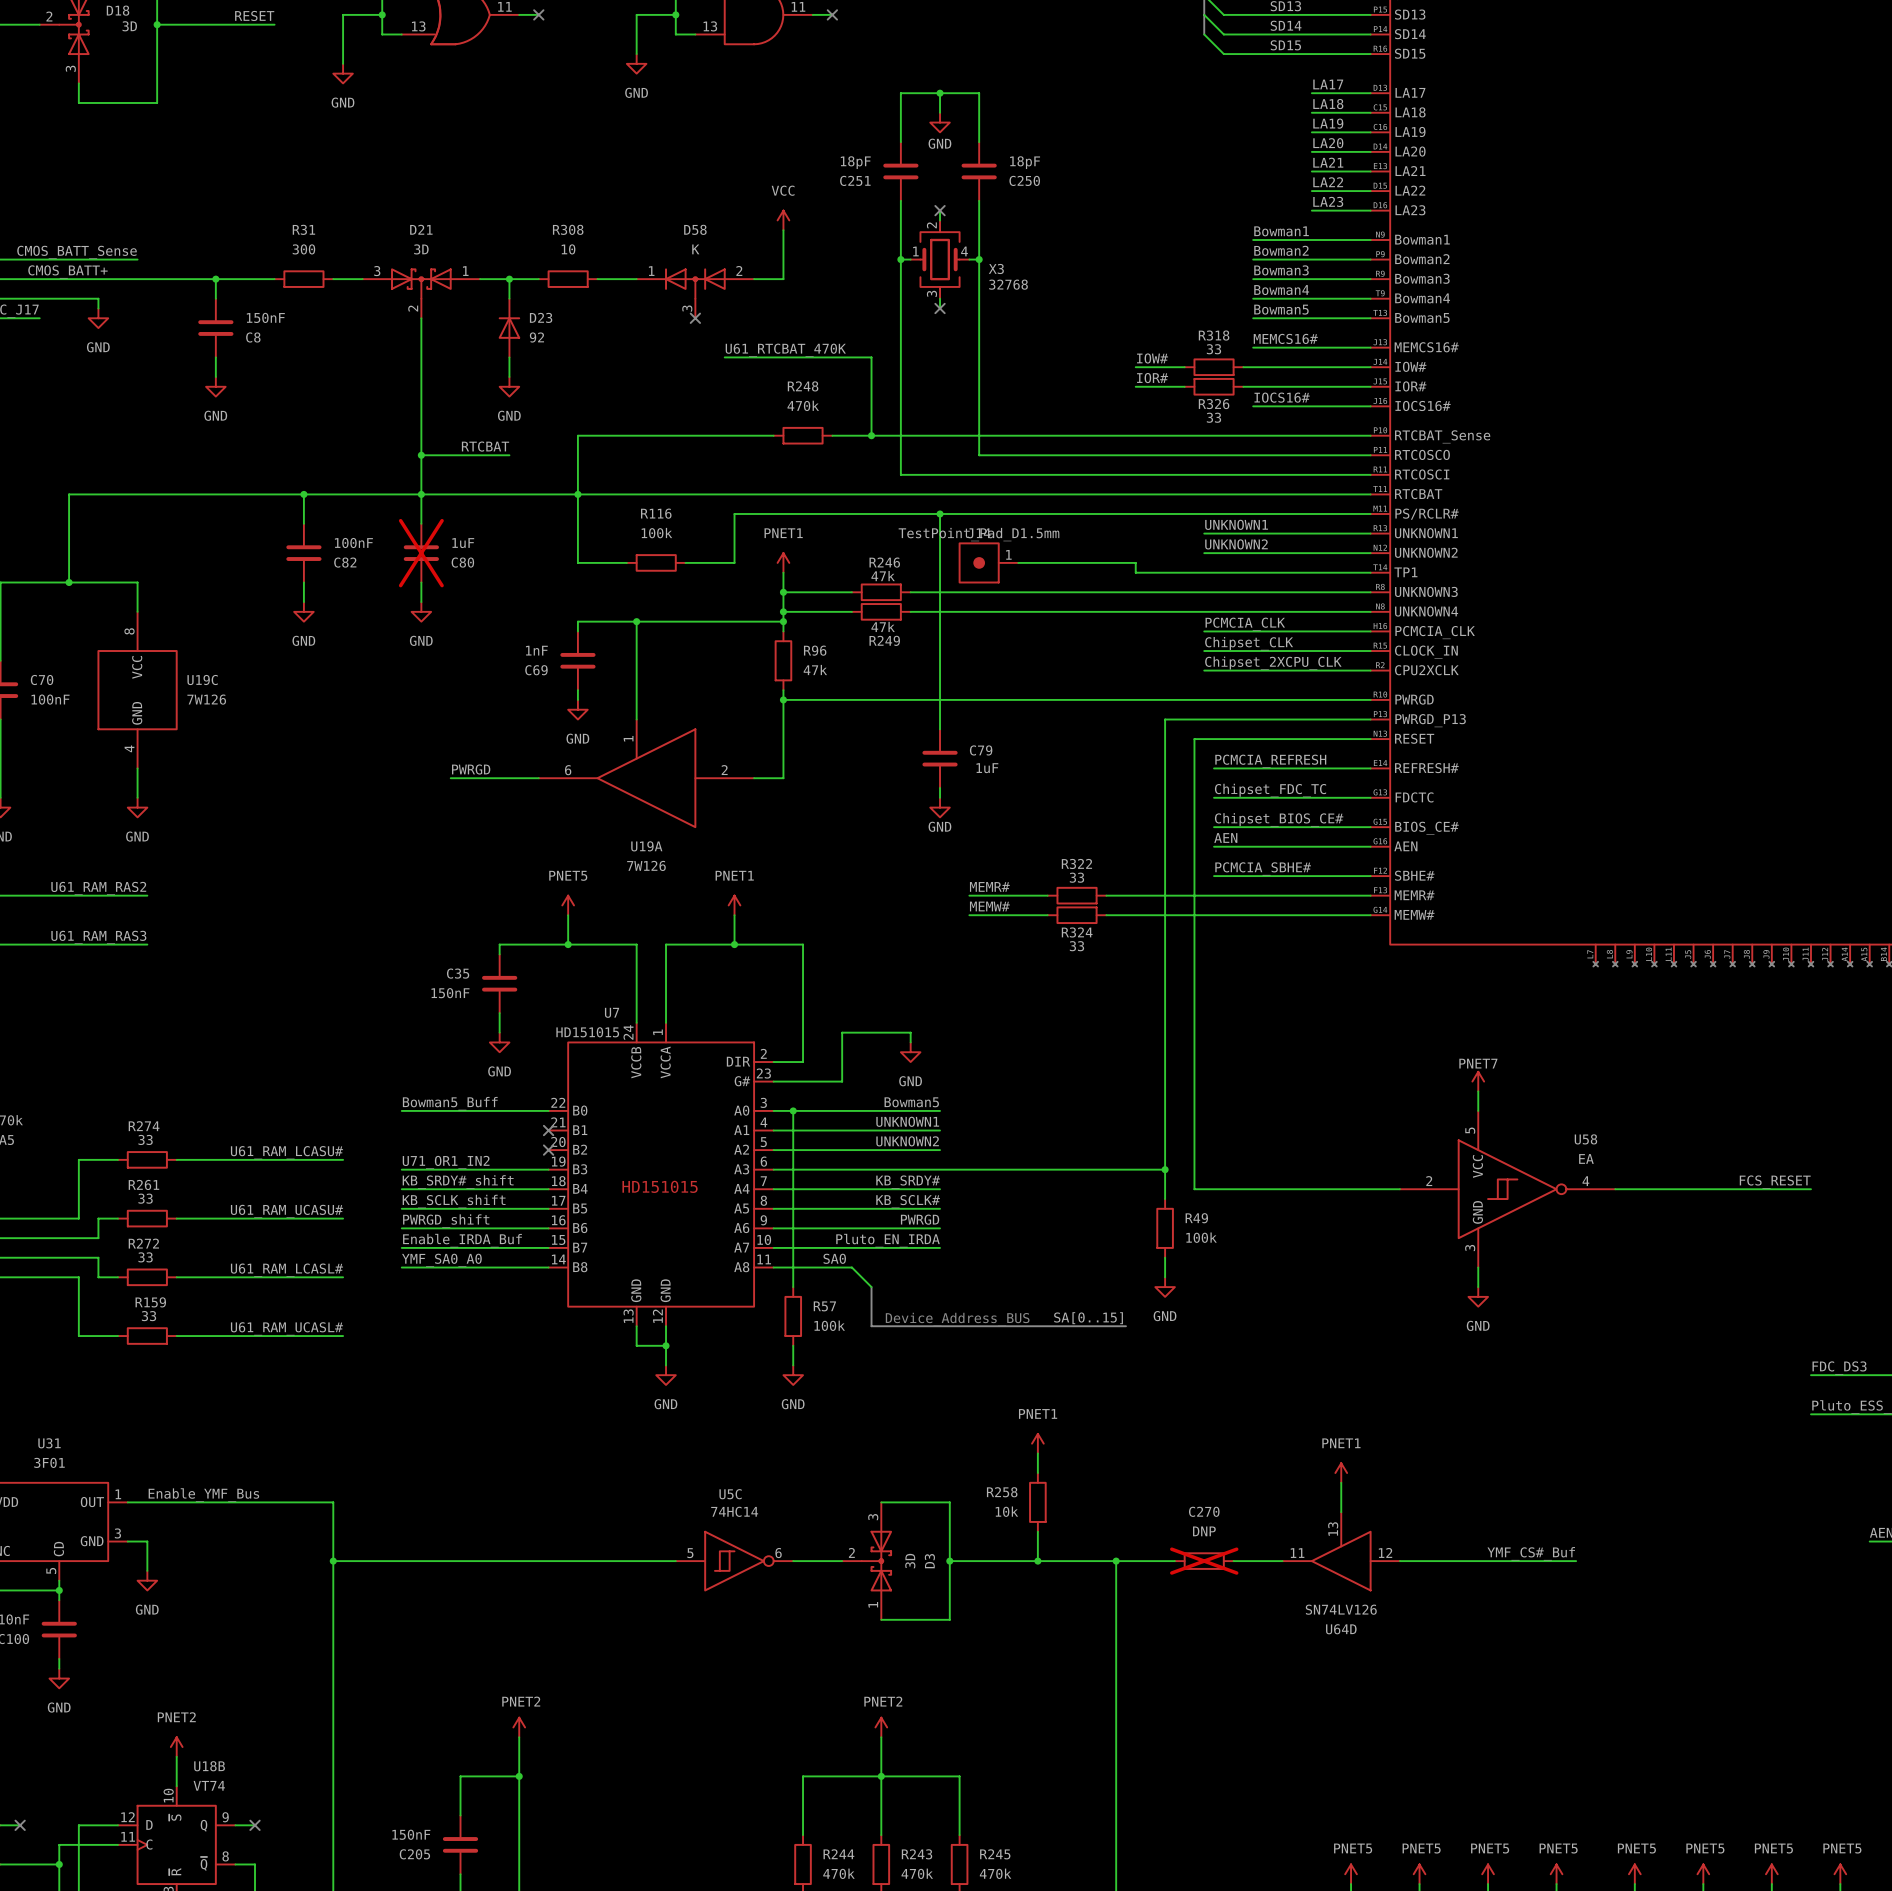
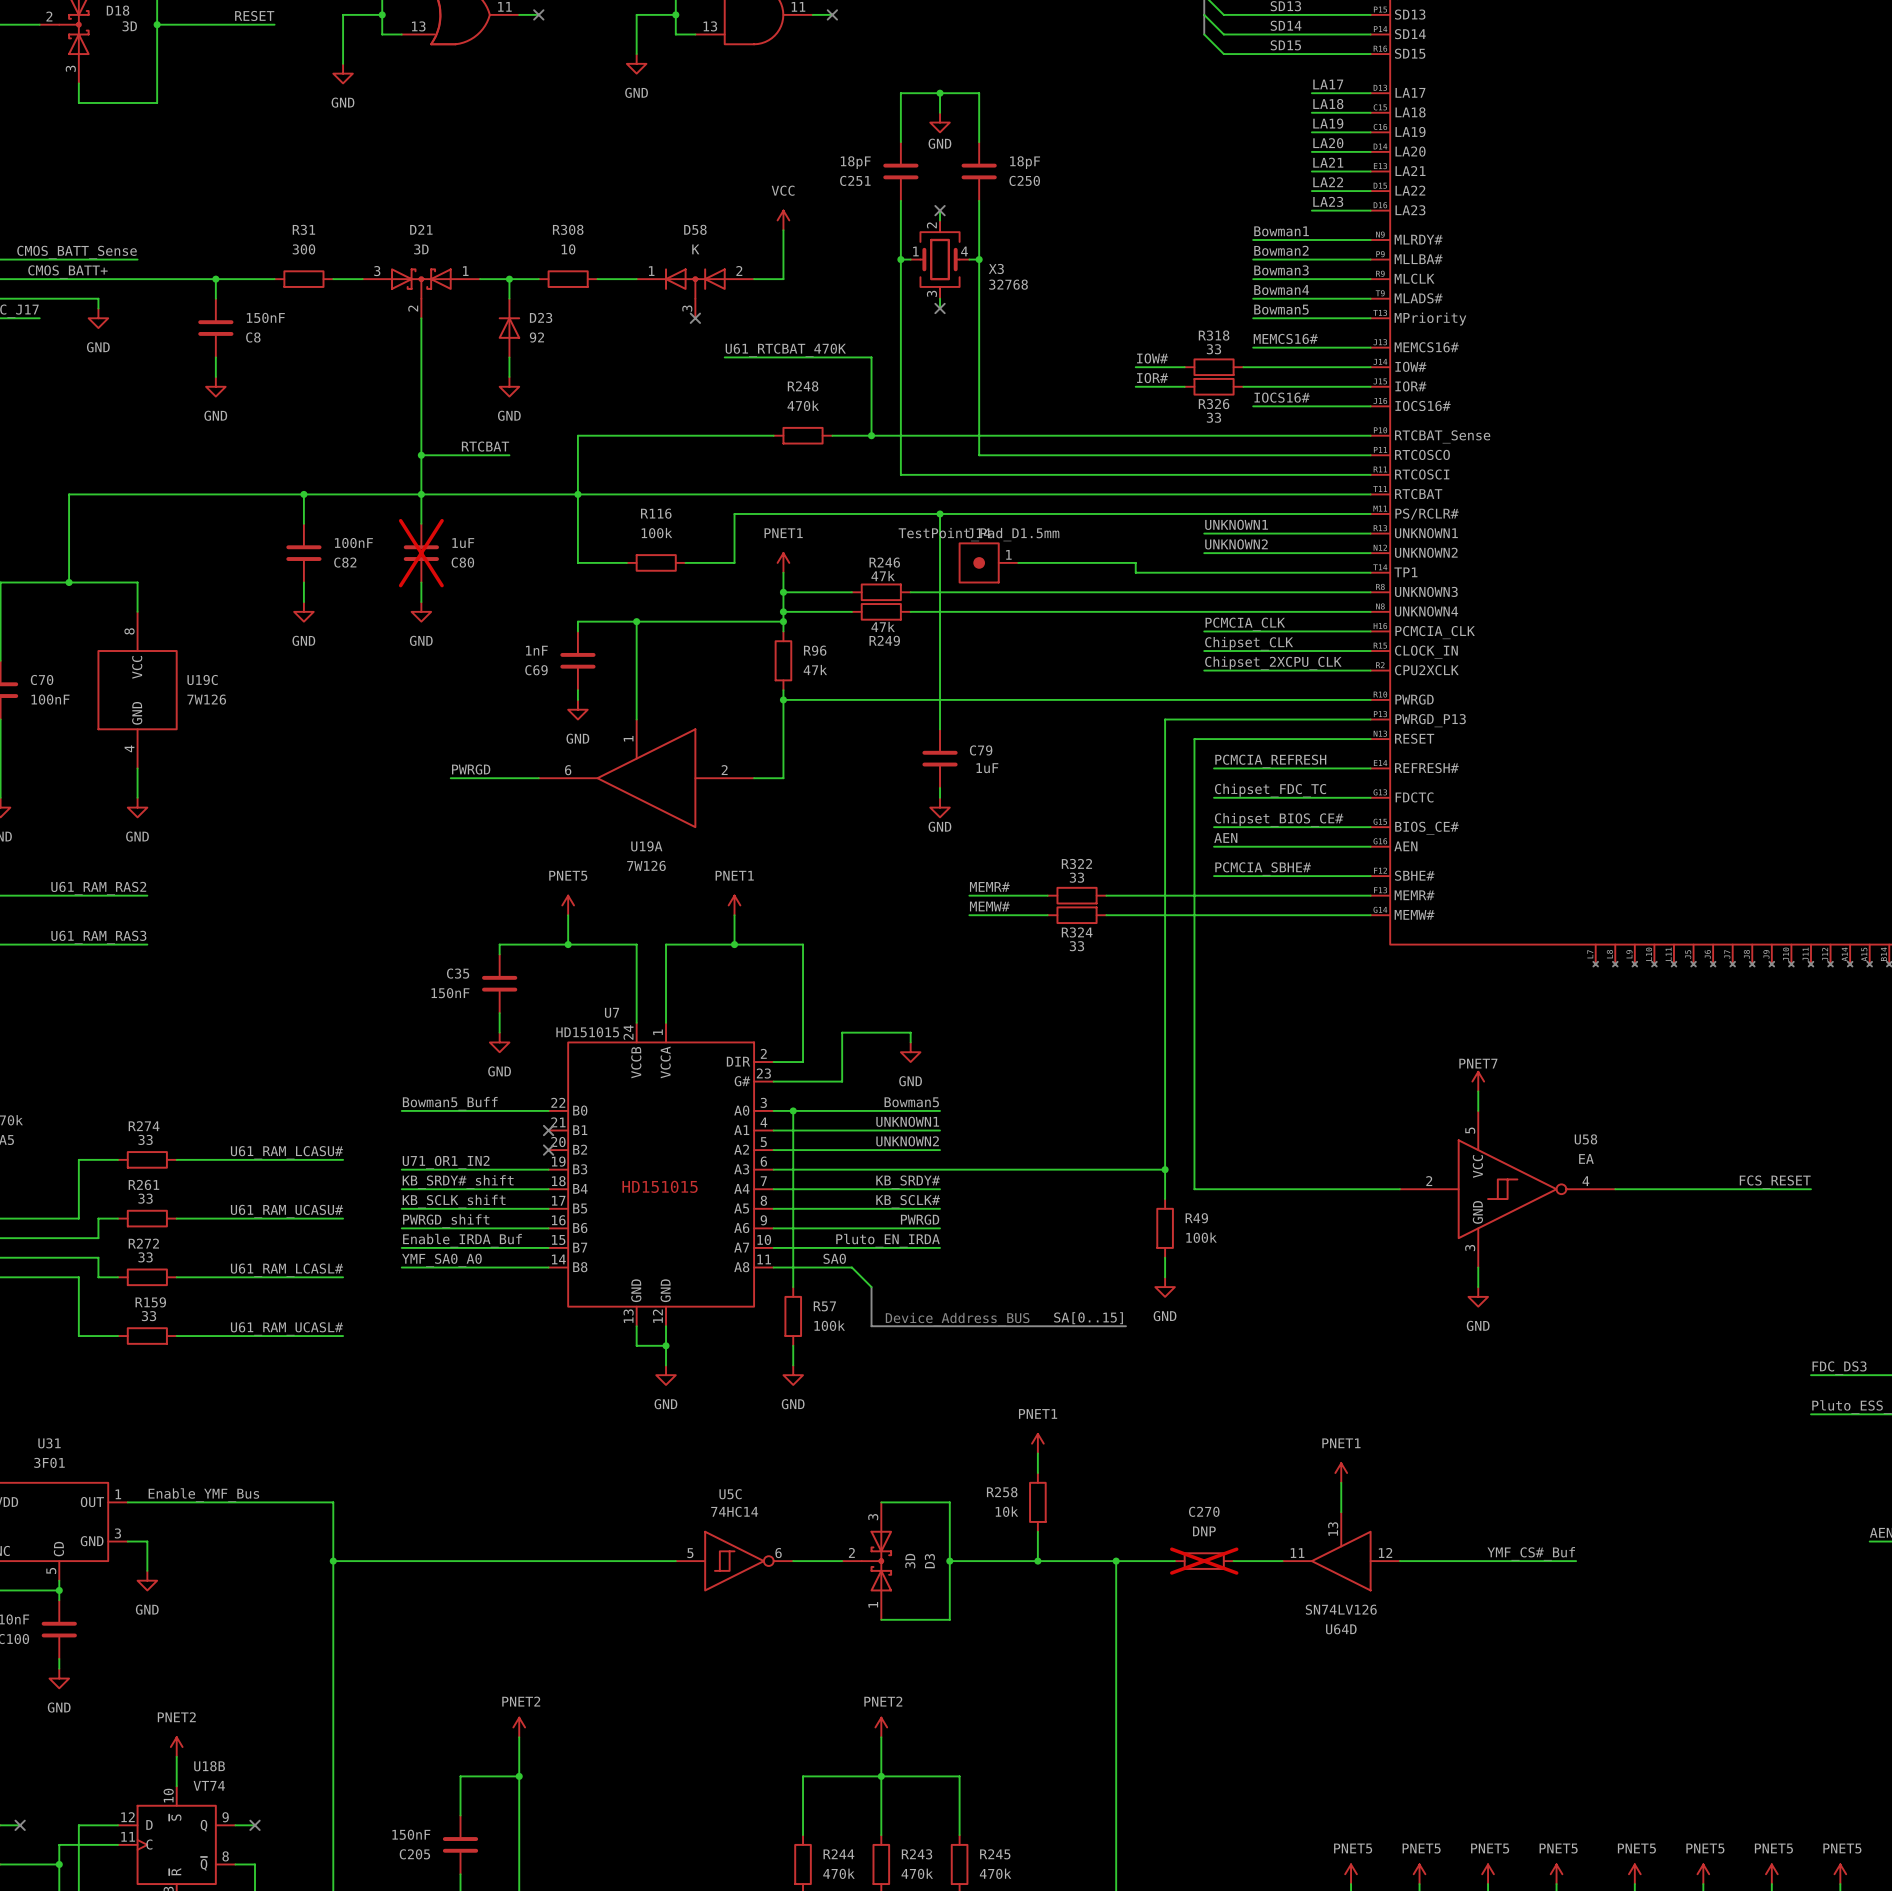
part pin name: Bowman1 (1422, 239) -> MLRDY# (1418, 239)
part pin name: Bowman2 (1422, 259) -> MLLBA# (1418, 259)
part pin name: Bowman3 (1422, 278) -> MLCLK (1414, 278)
part pin name: Bowman4 (1422, 298) -> MLADS# (1418, 298)
part pin name: Bowman5 (1422, 318) -> MPriority (1430, 319)

